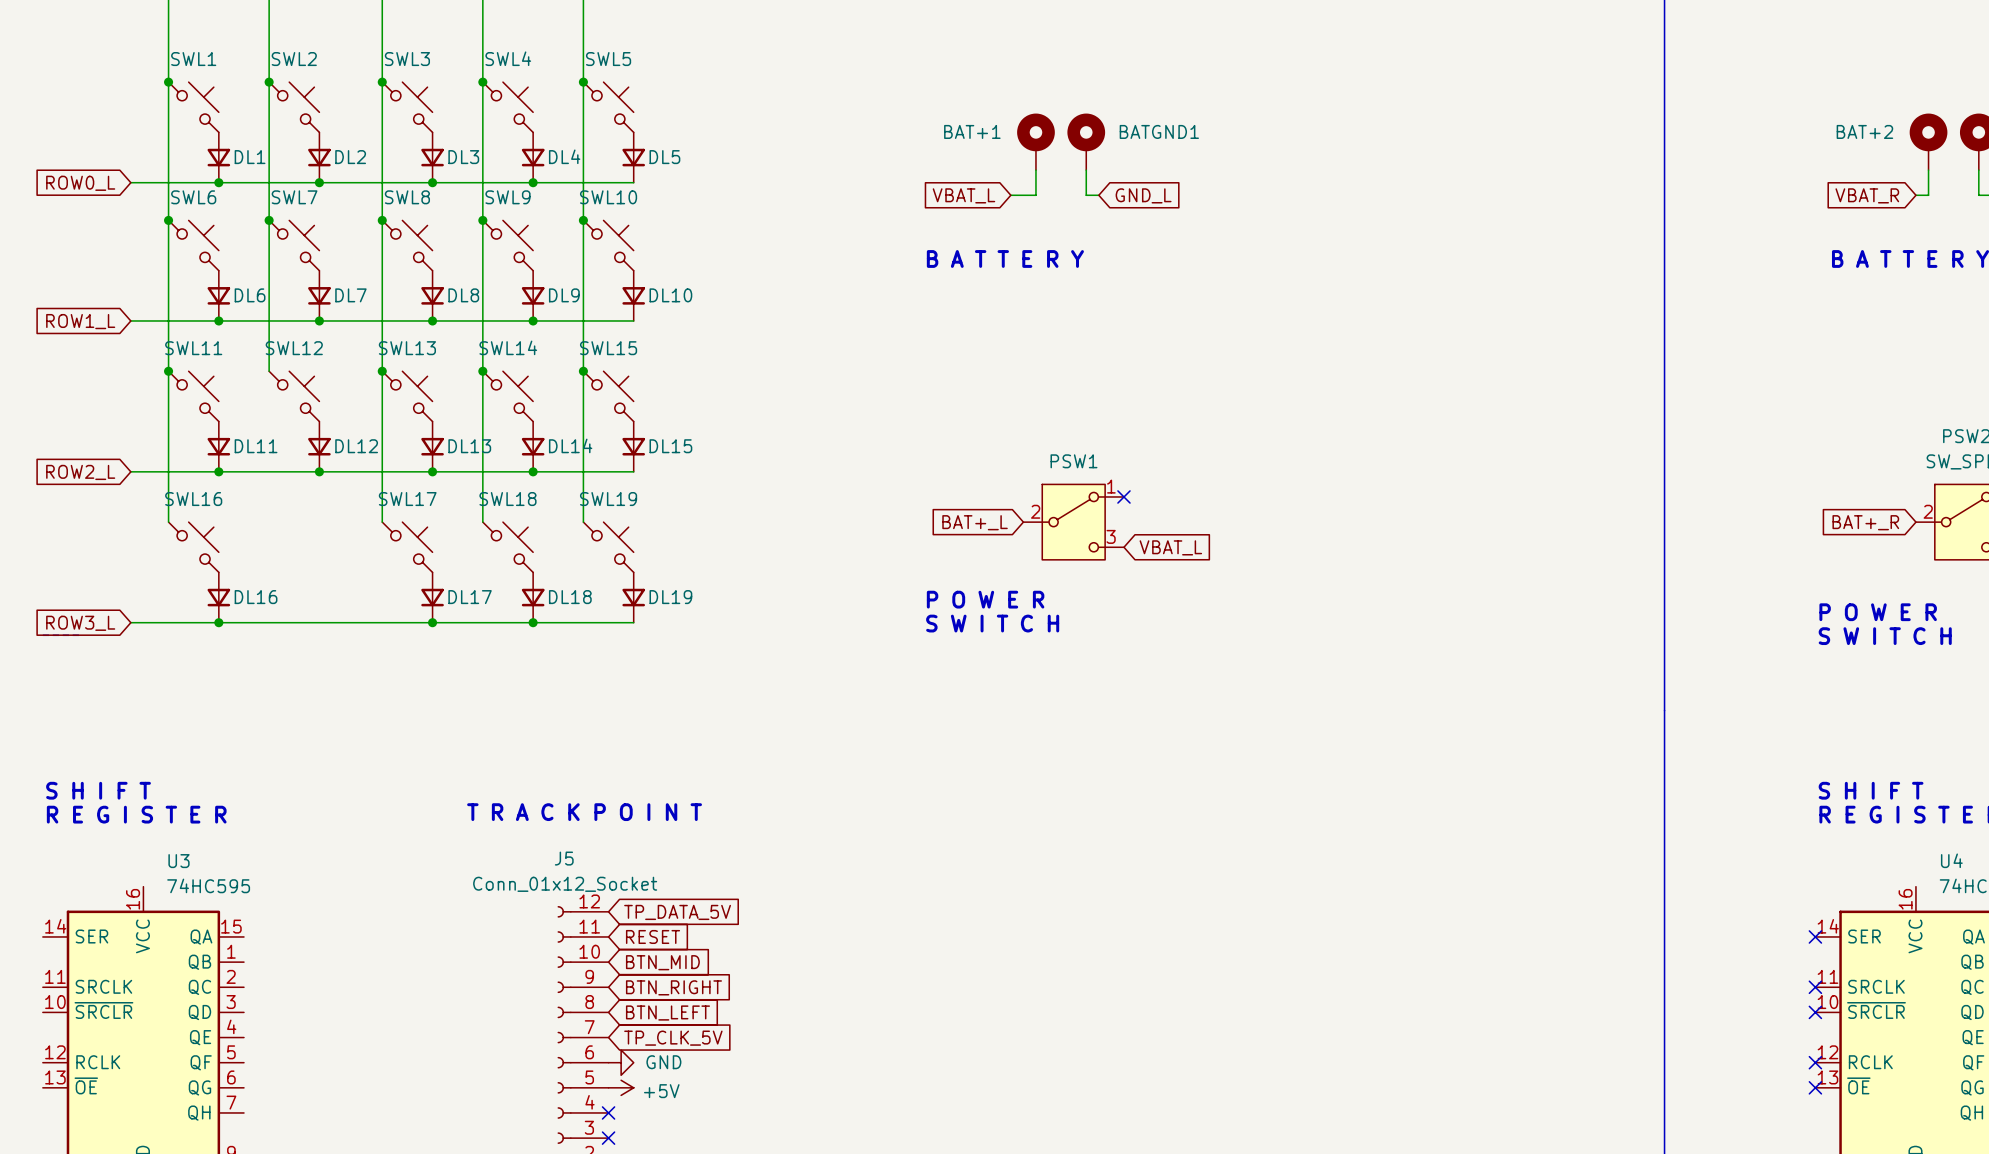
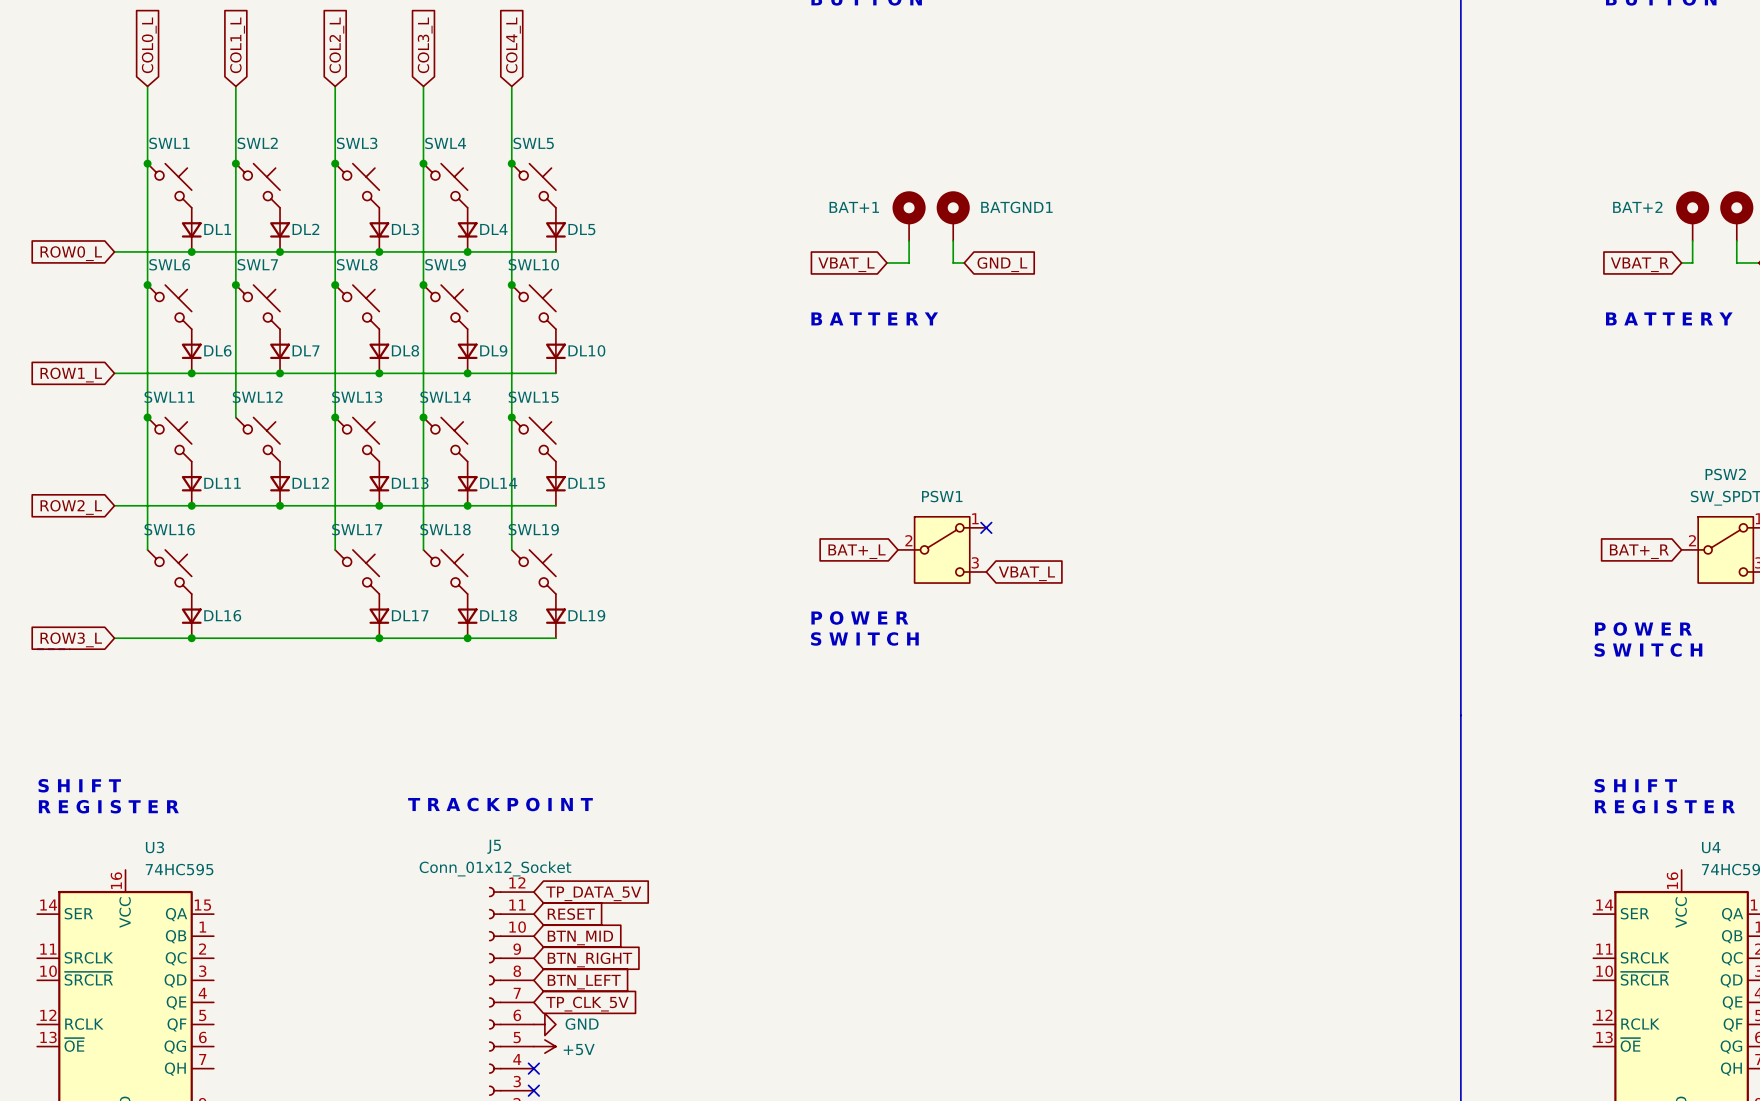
no-connect mark: (1815, 936) -> none
no-connect mark: (1815, 987) -> none
no-connect mark: (1815, 1012) -> none
no-connect mark: (1815, 1062) -> none
no-connect mark: (1815, 1087) -> none

